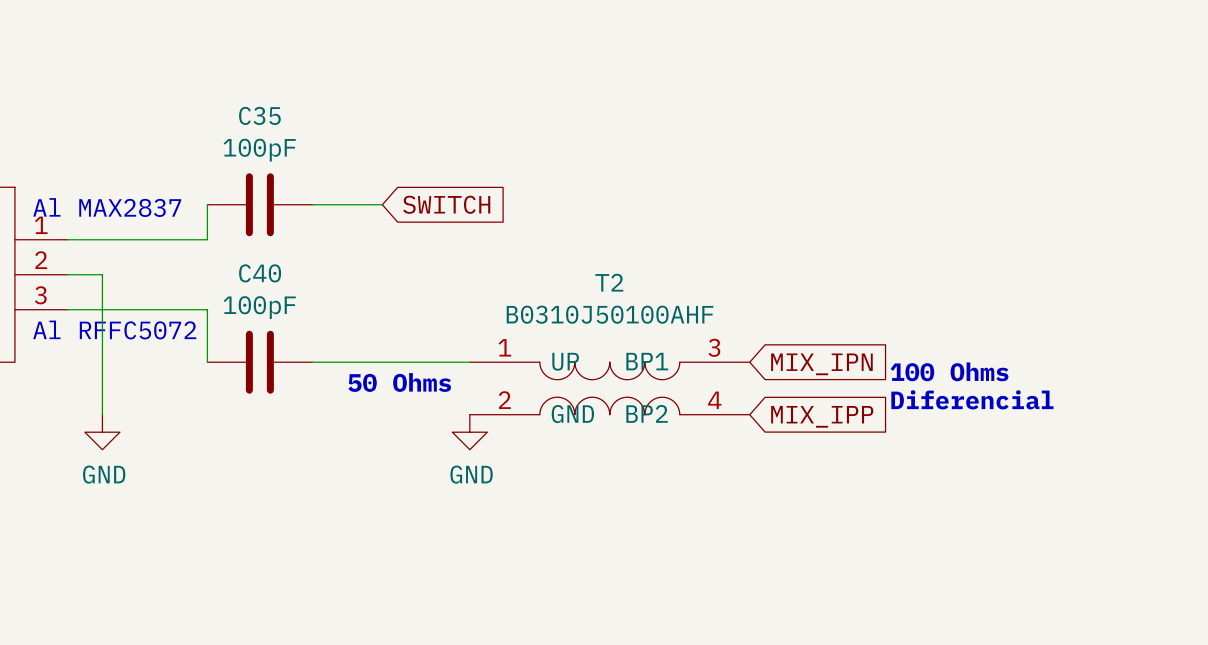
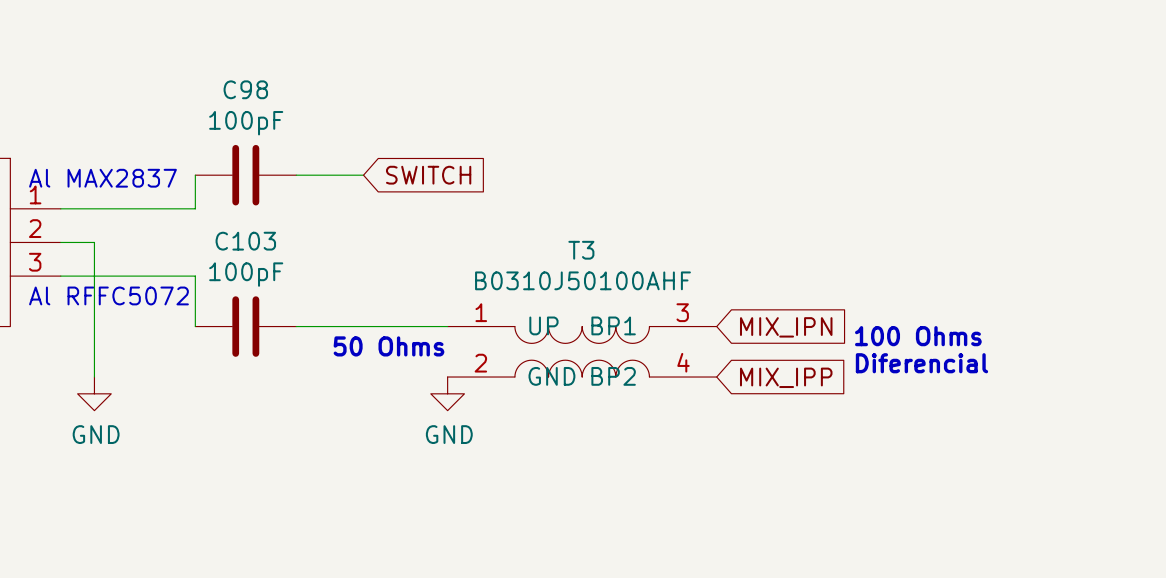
C35 name: C35 (259, 115) -> C98 (245, 89)
C40 name: C40 (260, 273) -> C103 (245, 241)
T2 name: T2 (609, 282) -> T3 (581, 250)

